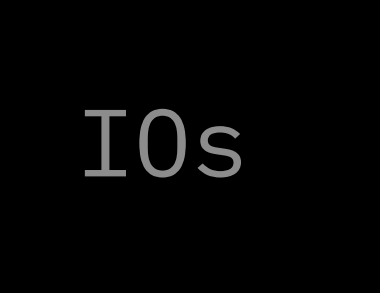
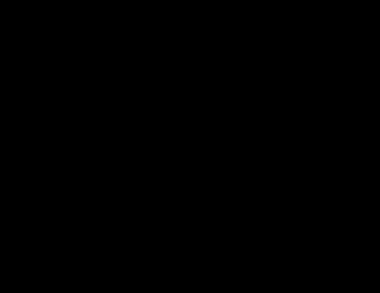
text: IOs (162, 143) -> none

